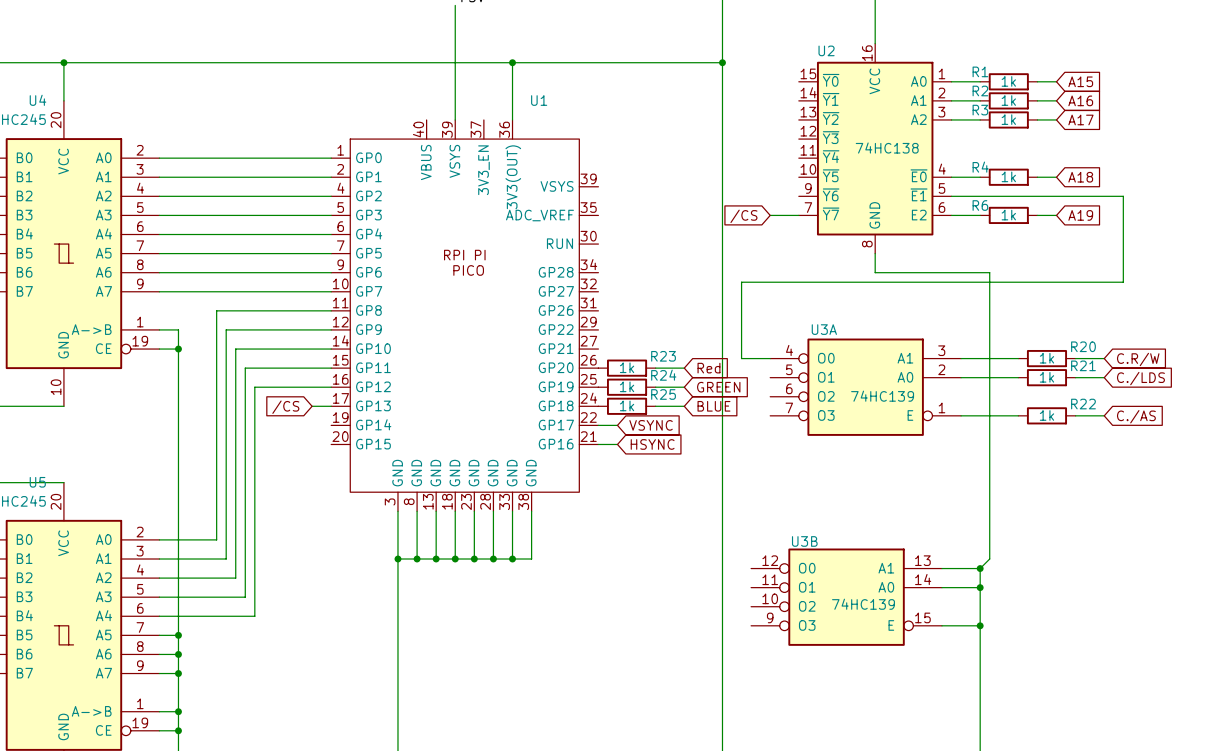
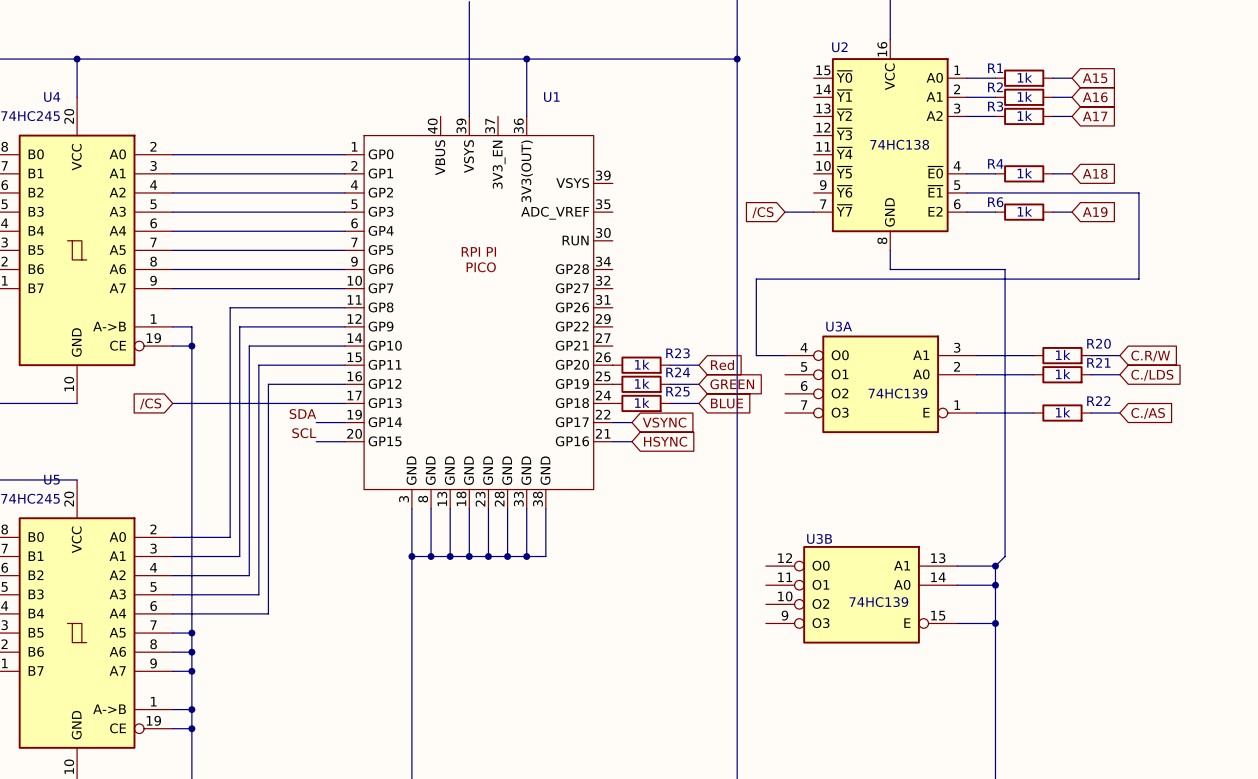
wire: none -> (172, 403) (325, 403)
global label position: /CS (285, 407) -> /CS (150, 403)
label: none -> SDA (302, 414)
wire: none -> (316, 422) (344, 422)
label: none -> SCL (304, 433)
wire: none -> (316, 441) (344, 441)

